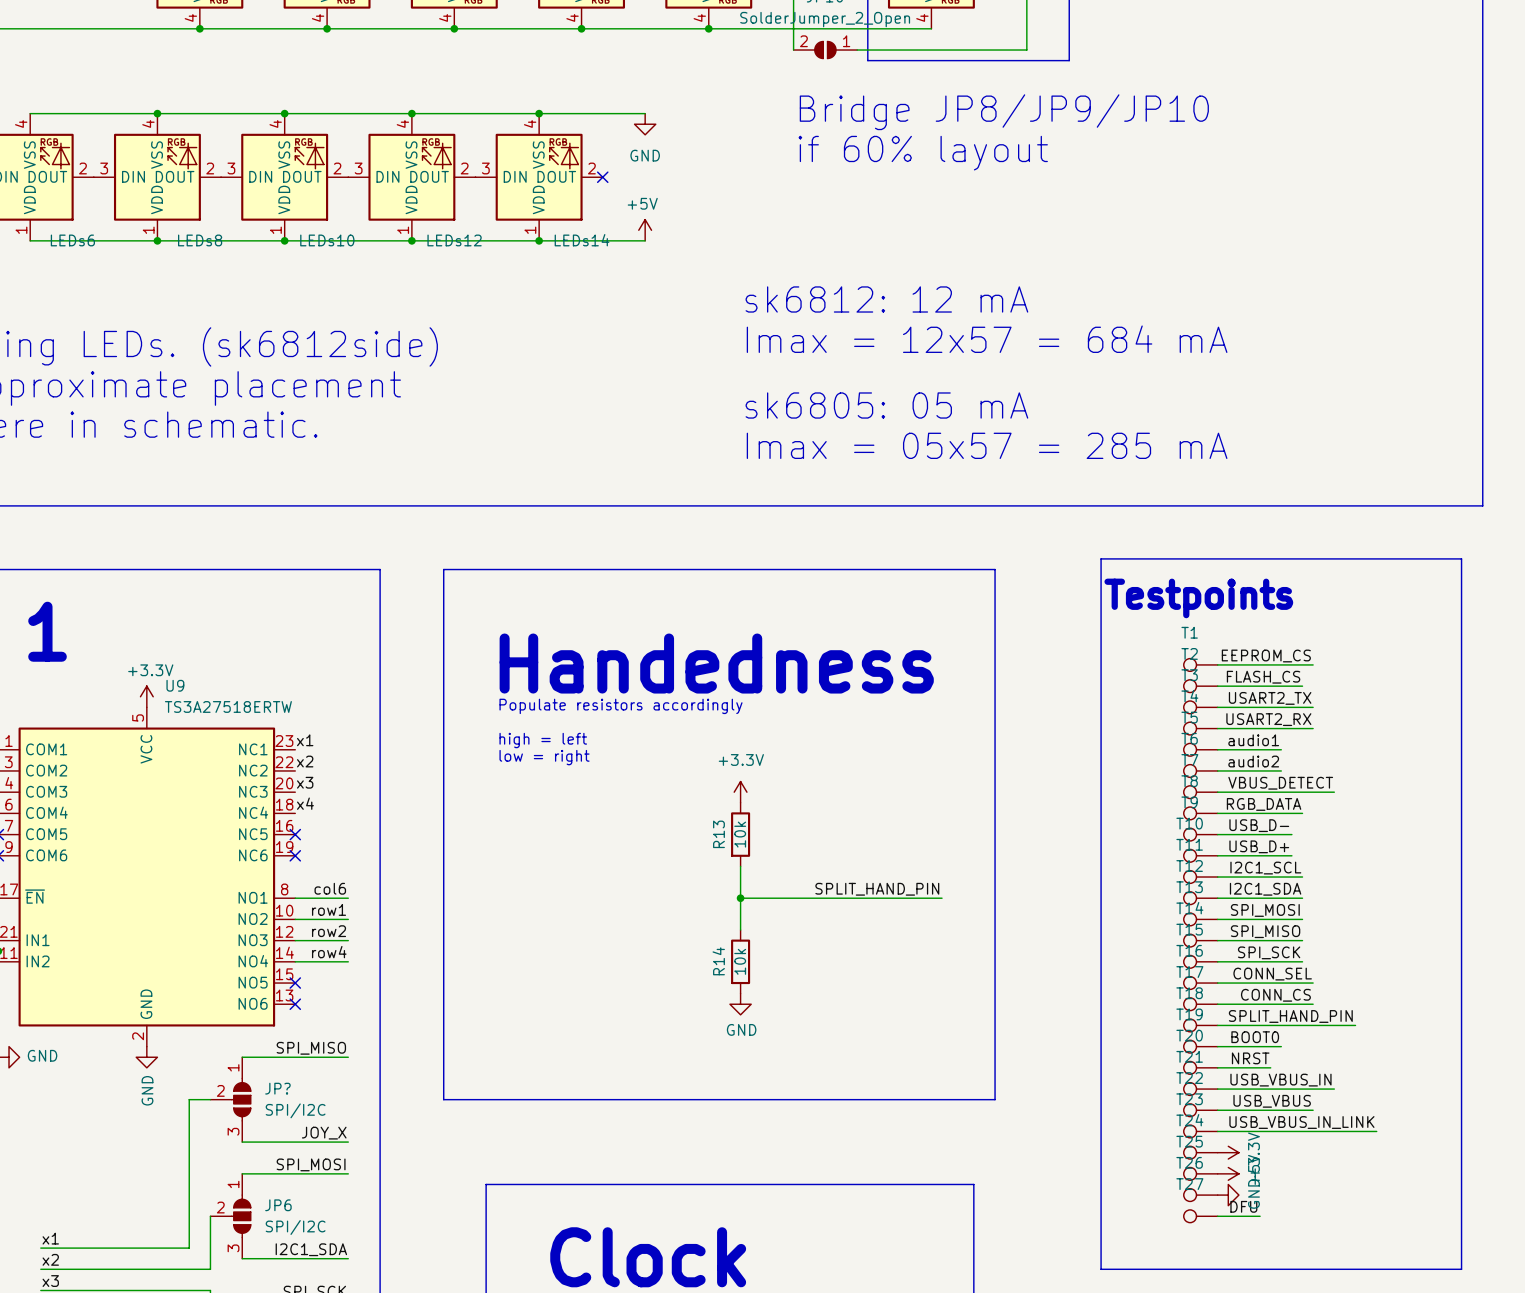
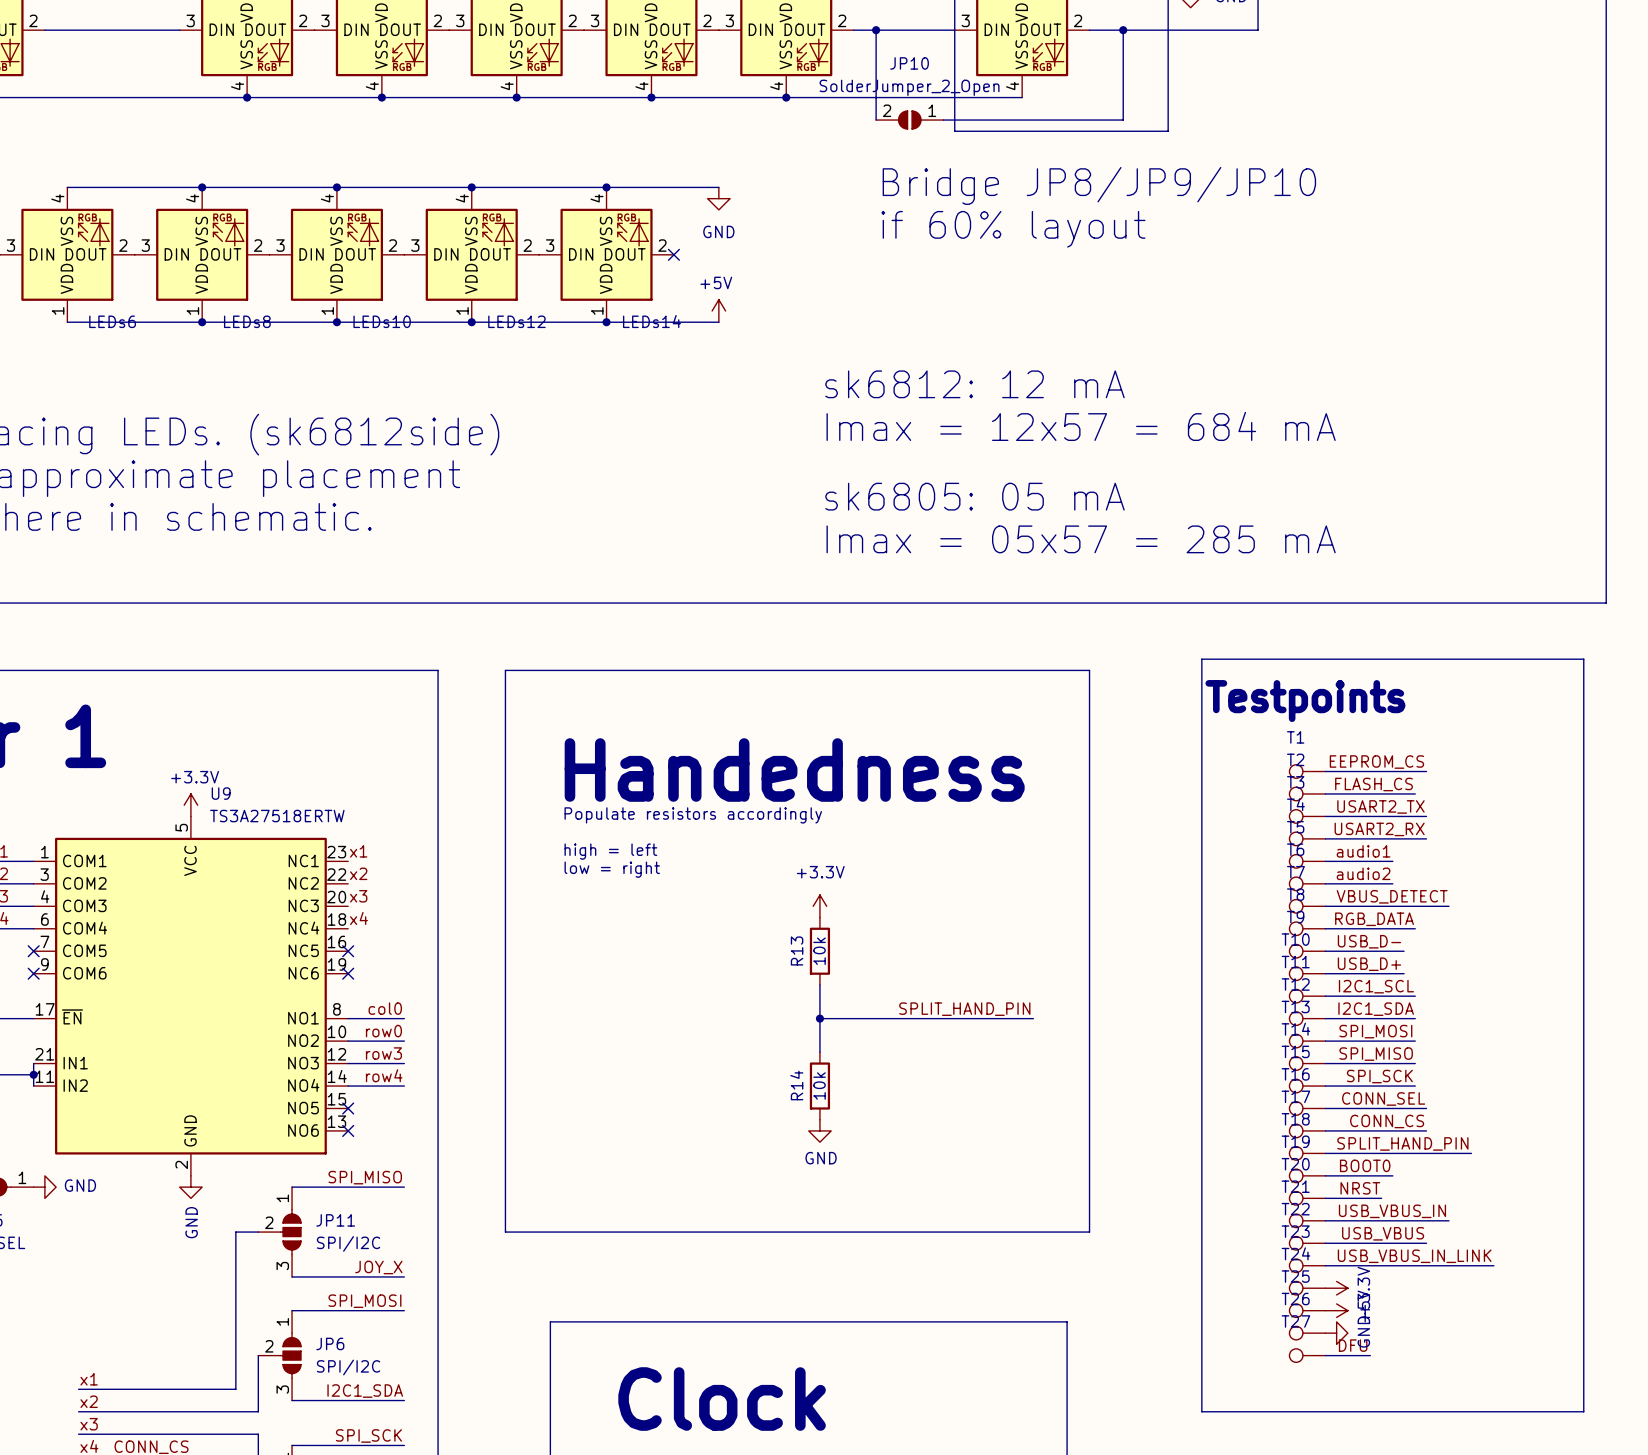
label: col6 (330, 888) -> col0 (385, 1008)
label: row1 (329, 909) -> row0 (383, 1031)
label: row2 (329, 931) -> row3 (383, 1053)
JP? name: JP? (277, 1088) -> JP11 (335, 1220)

